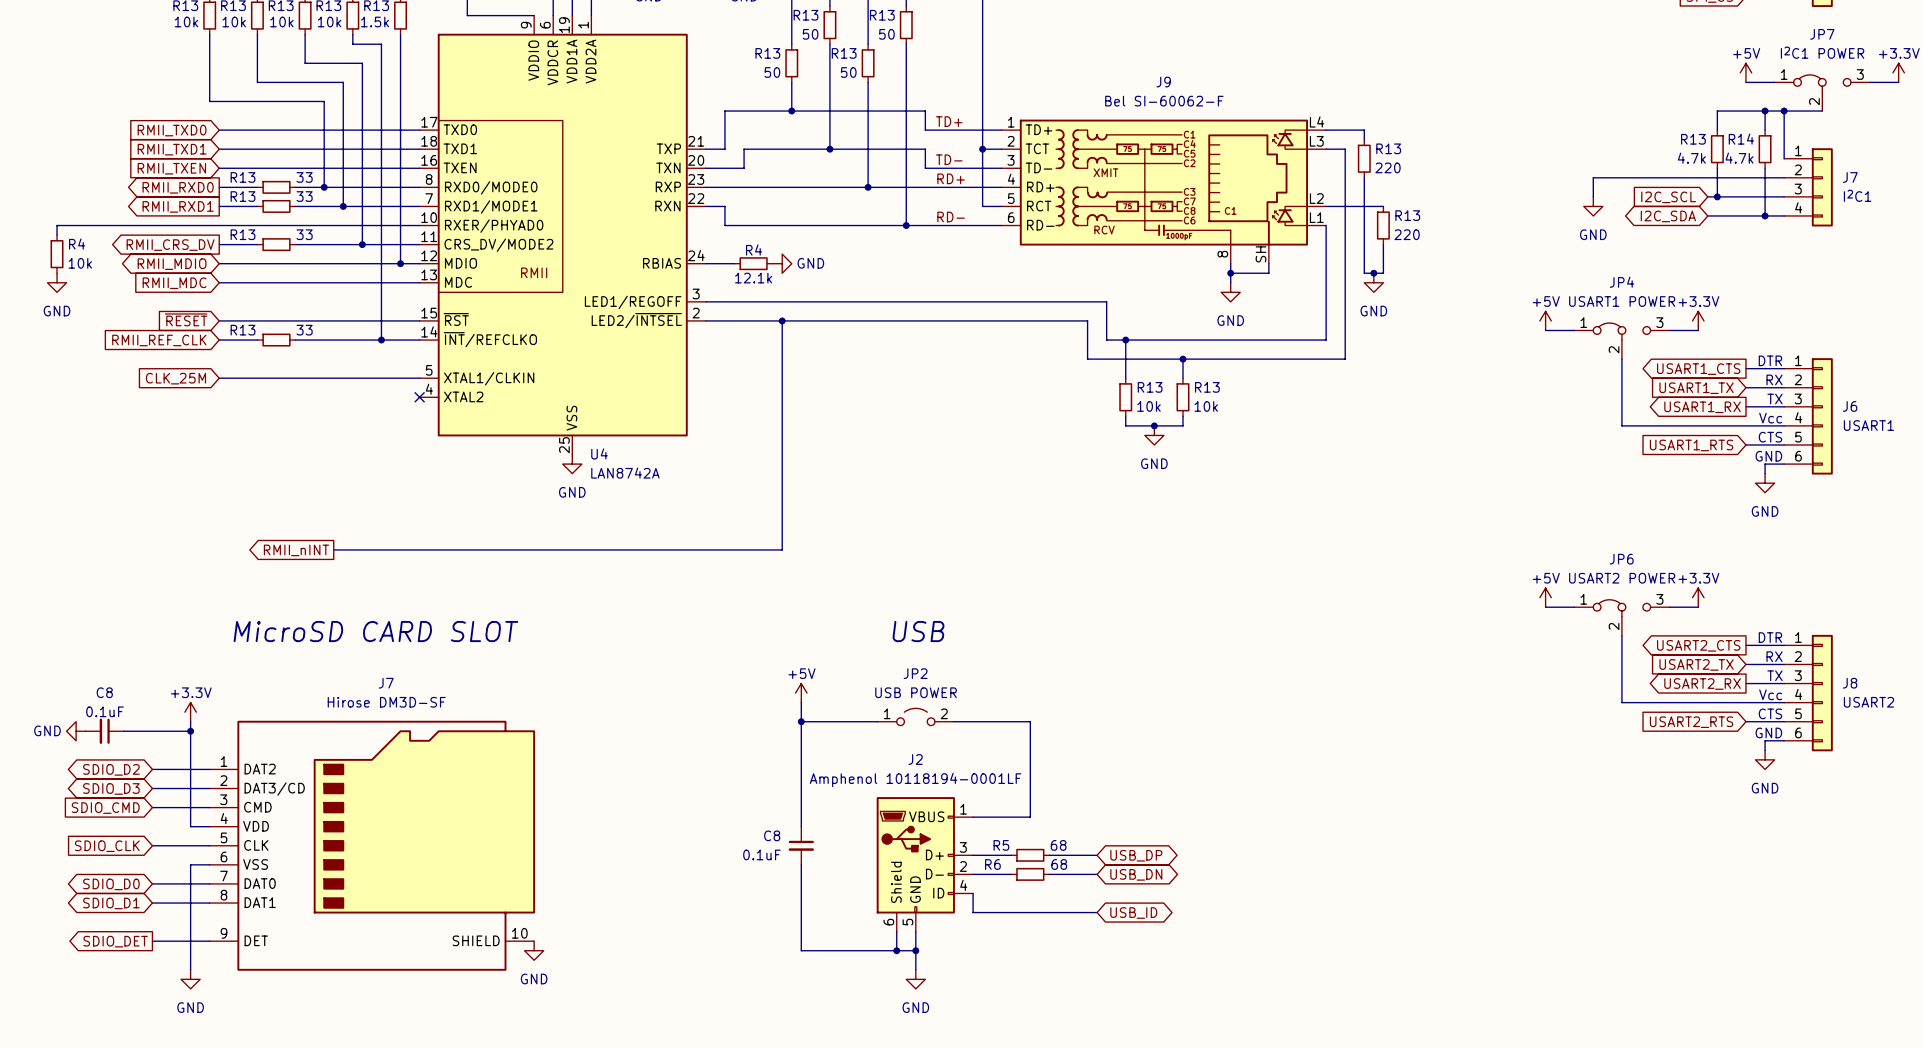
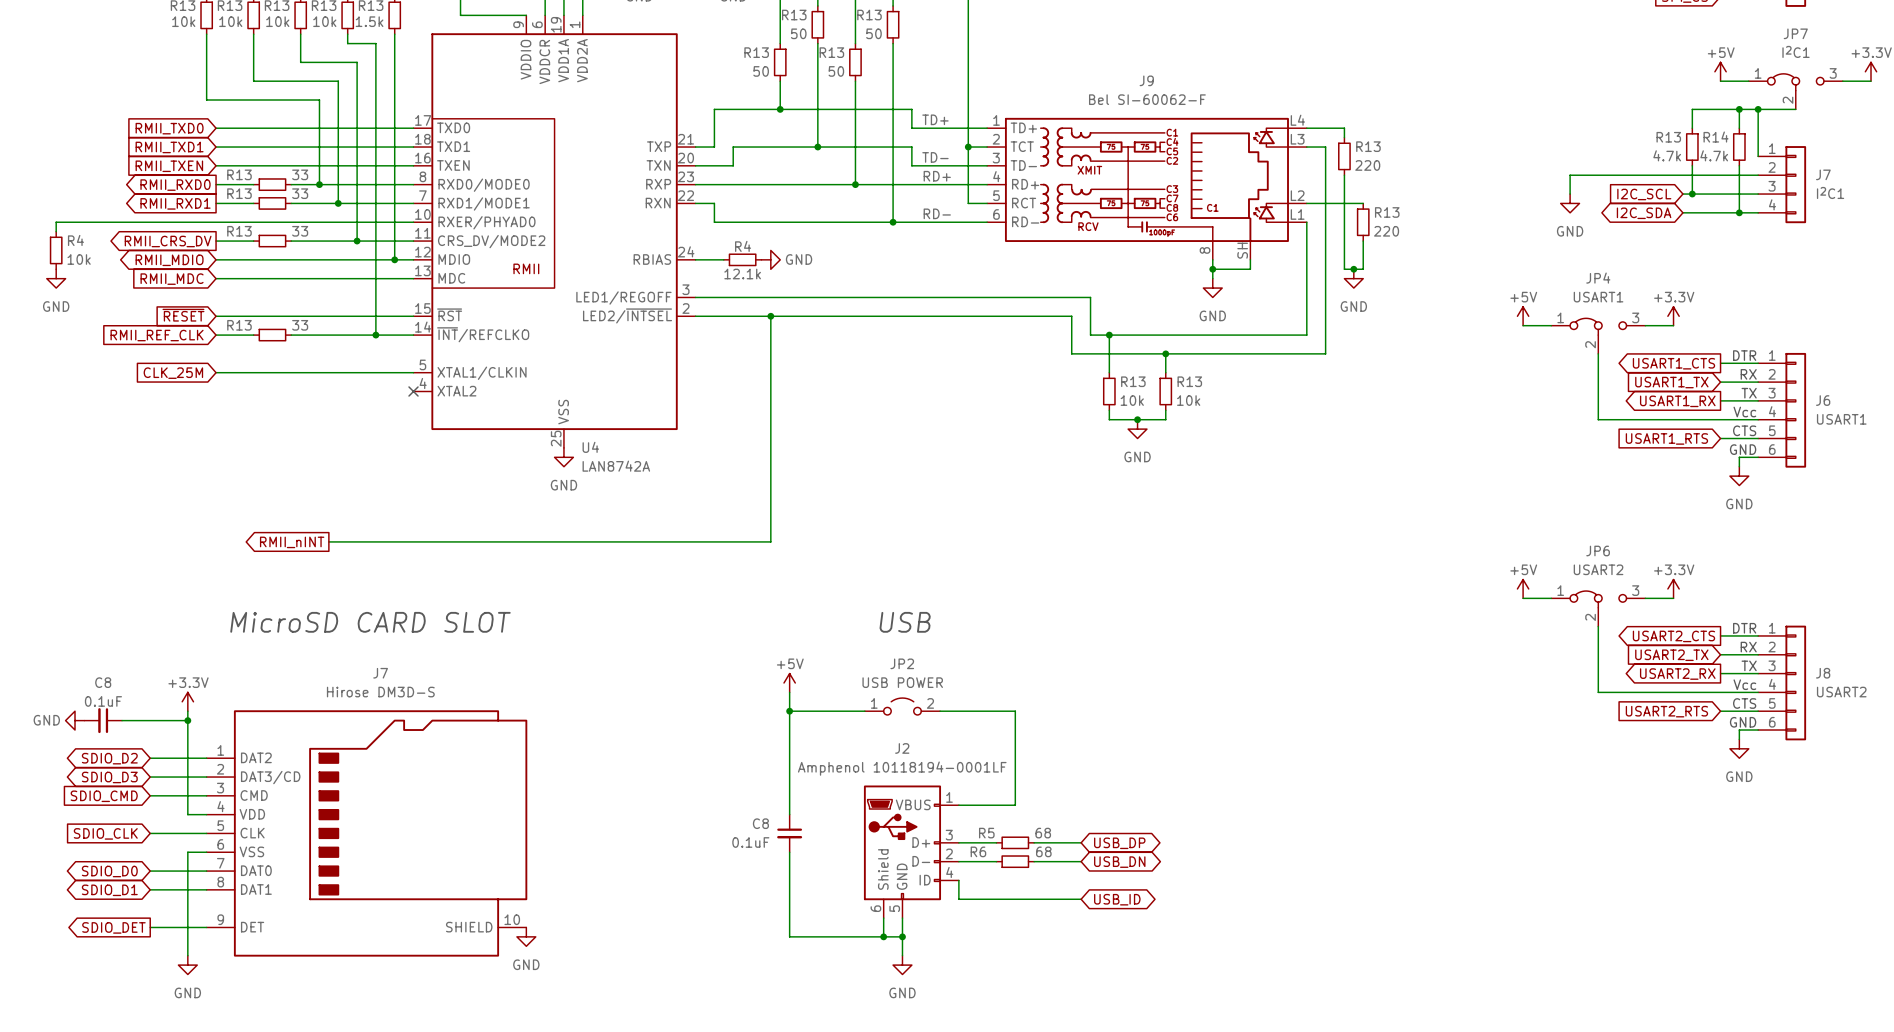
JP7 value: I2C1 POWER (1822, 52) -> I2C1 (1796, 51)
JP4 value: USART1 POWER (1622, 301) -> USART1 (1598, 297)
JP6 value: USART2 POWER (1622, 578) -> USART2 (1598, 569)
J7 value: Hirose DM3D-SF (386, 702) -> Hirose DM3D-S (380, 692)

